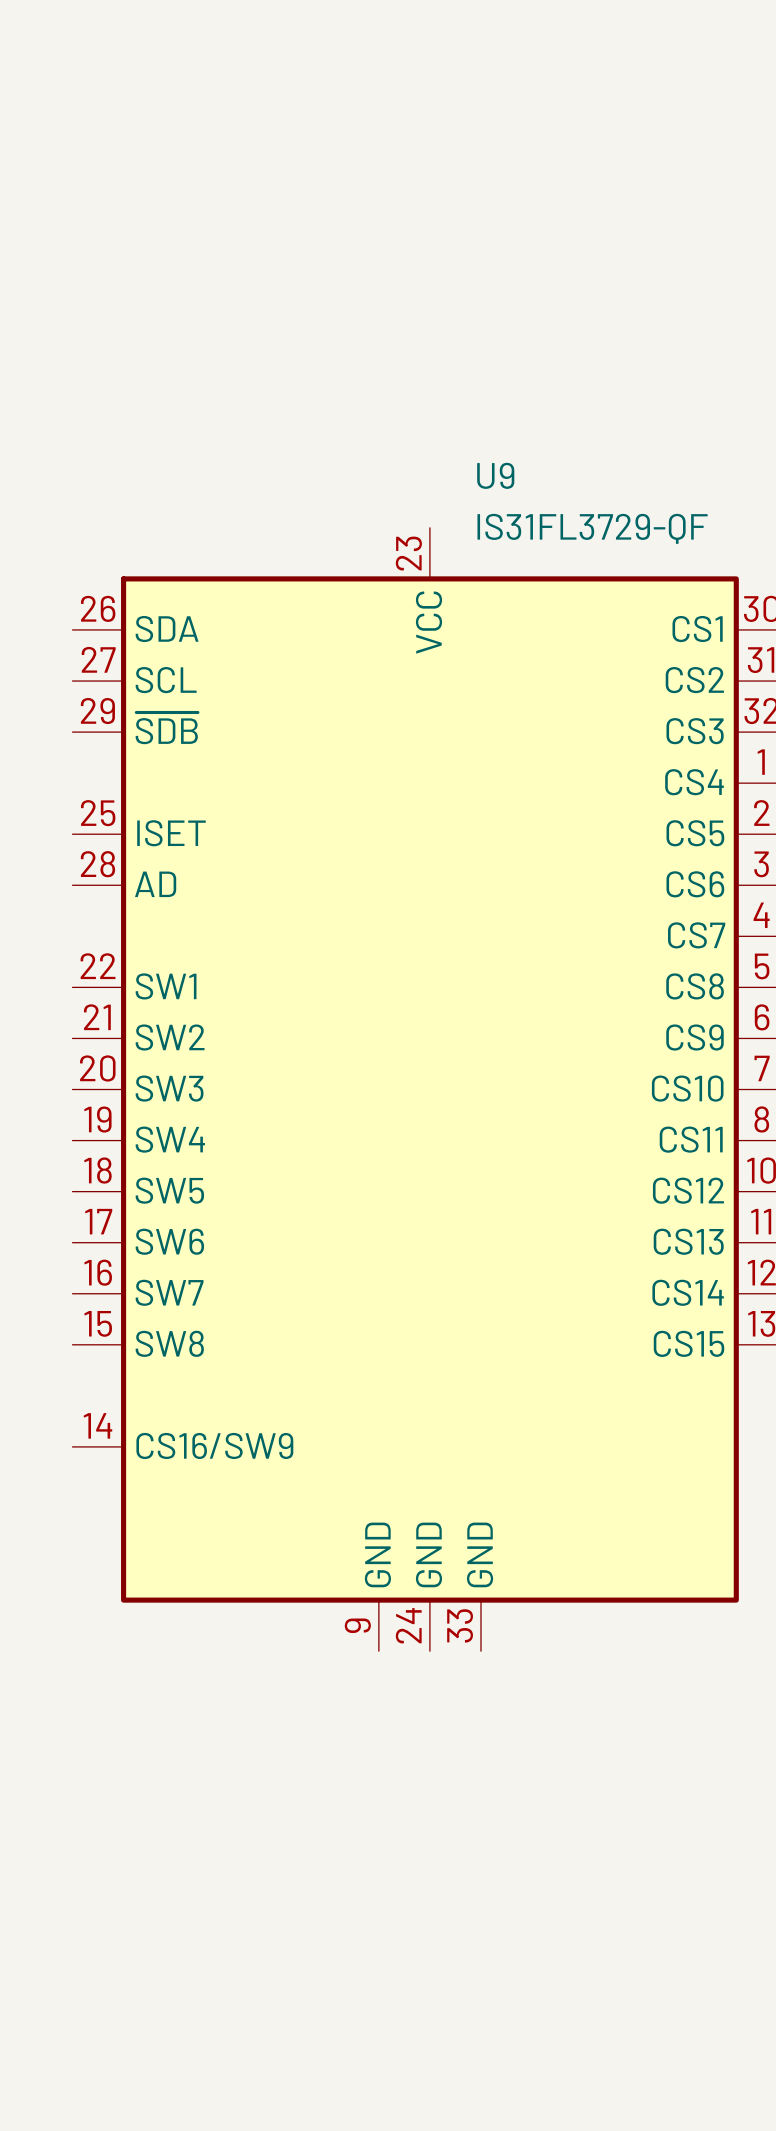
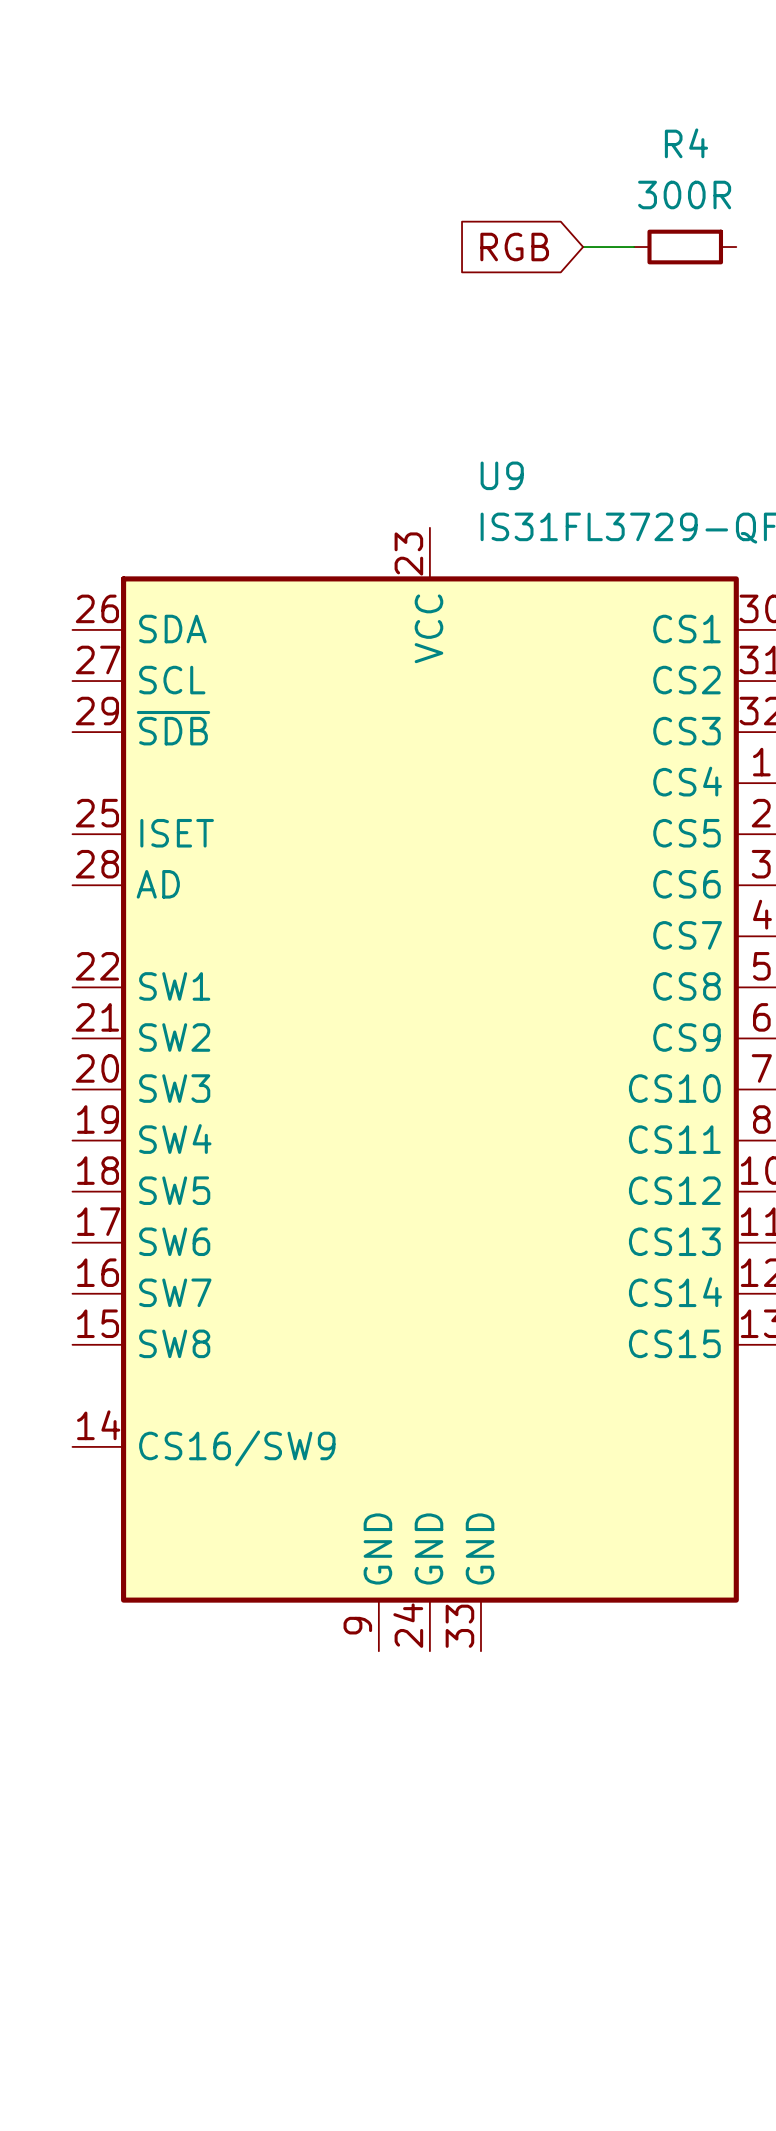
global label: none -> RGB (514, 247)
wire: none -> (583, 247) (634, 247)
R4: none -> 300R (685, 247)

